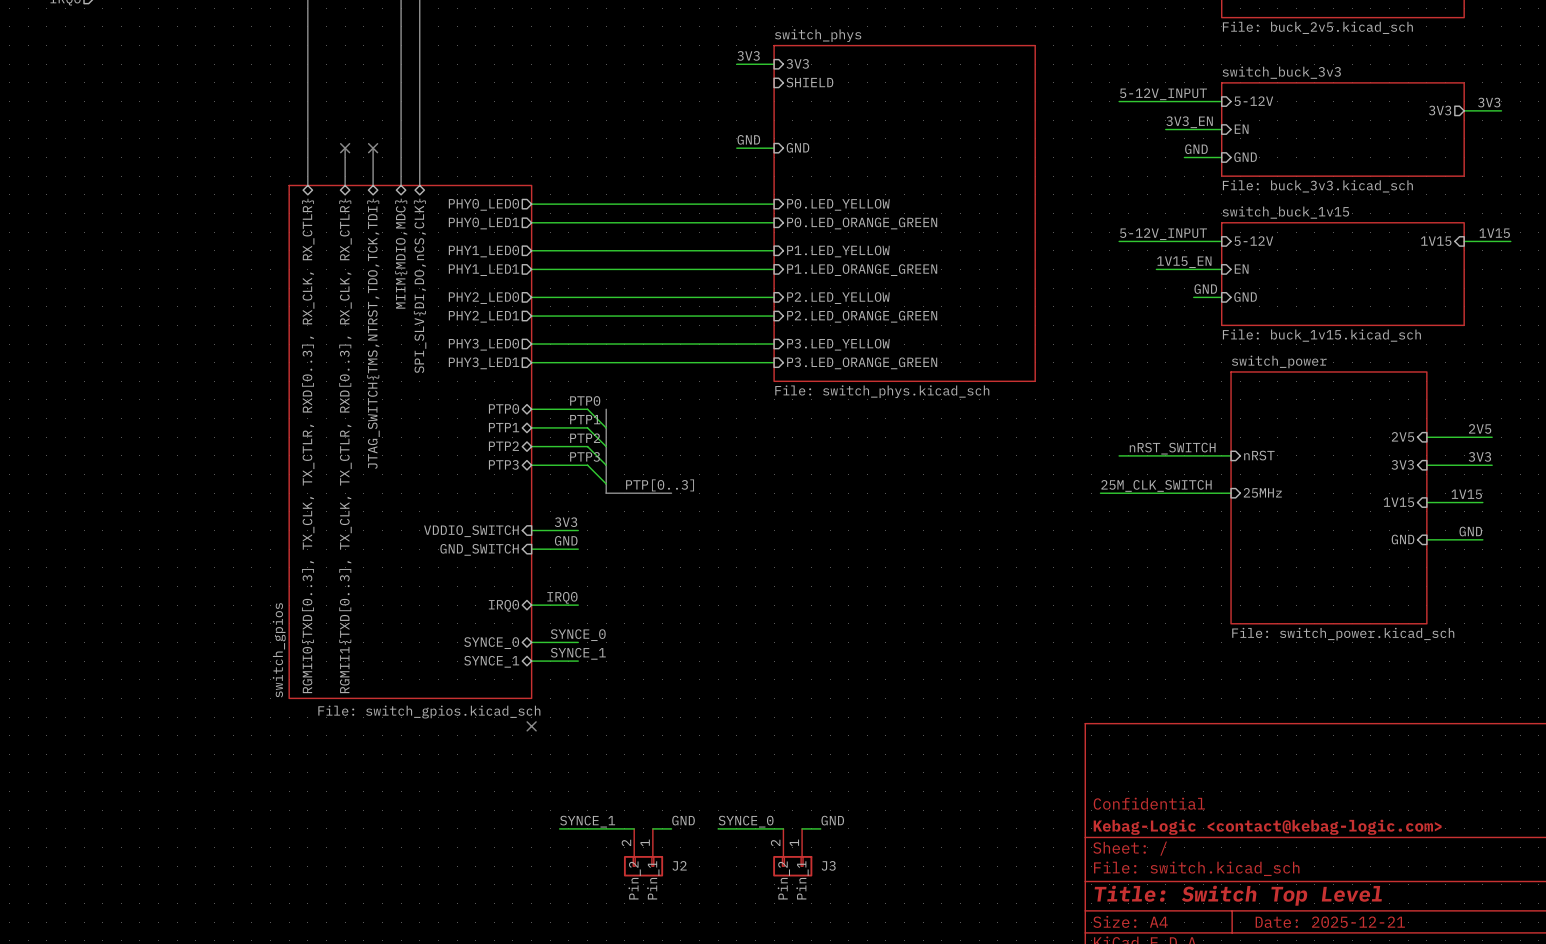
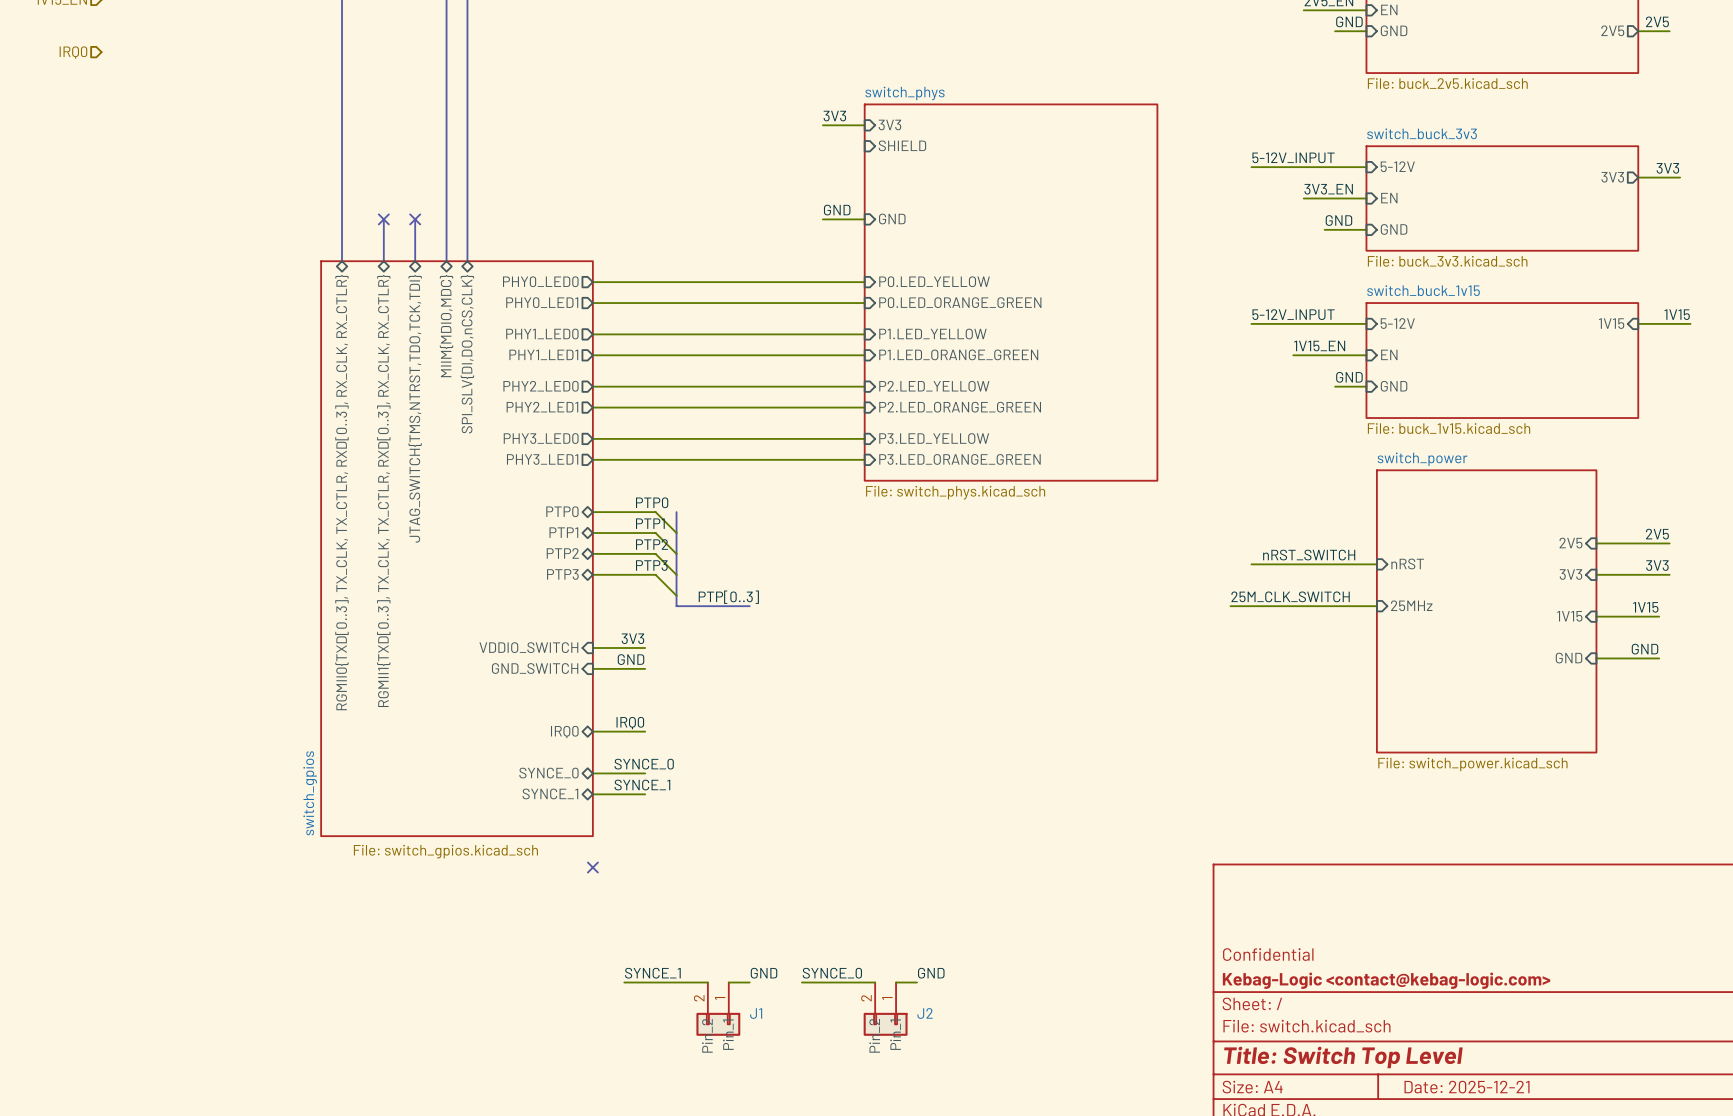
J2 name: J2 (679, 865) -> J1 (756, 1013)
J3 name: J3 (828, 865) -> J2 (925, 1013)

